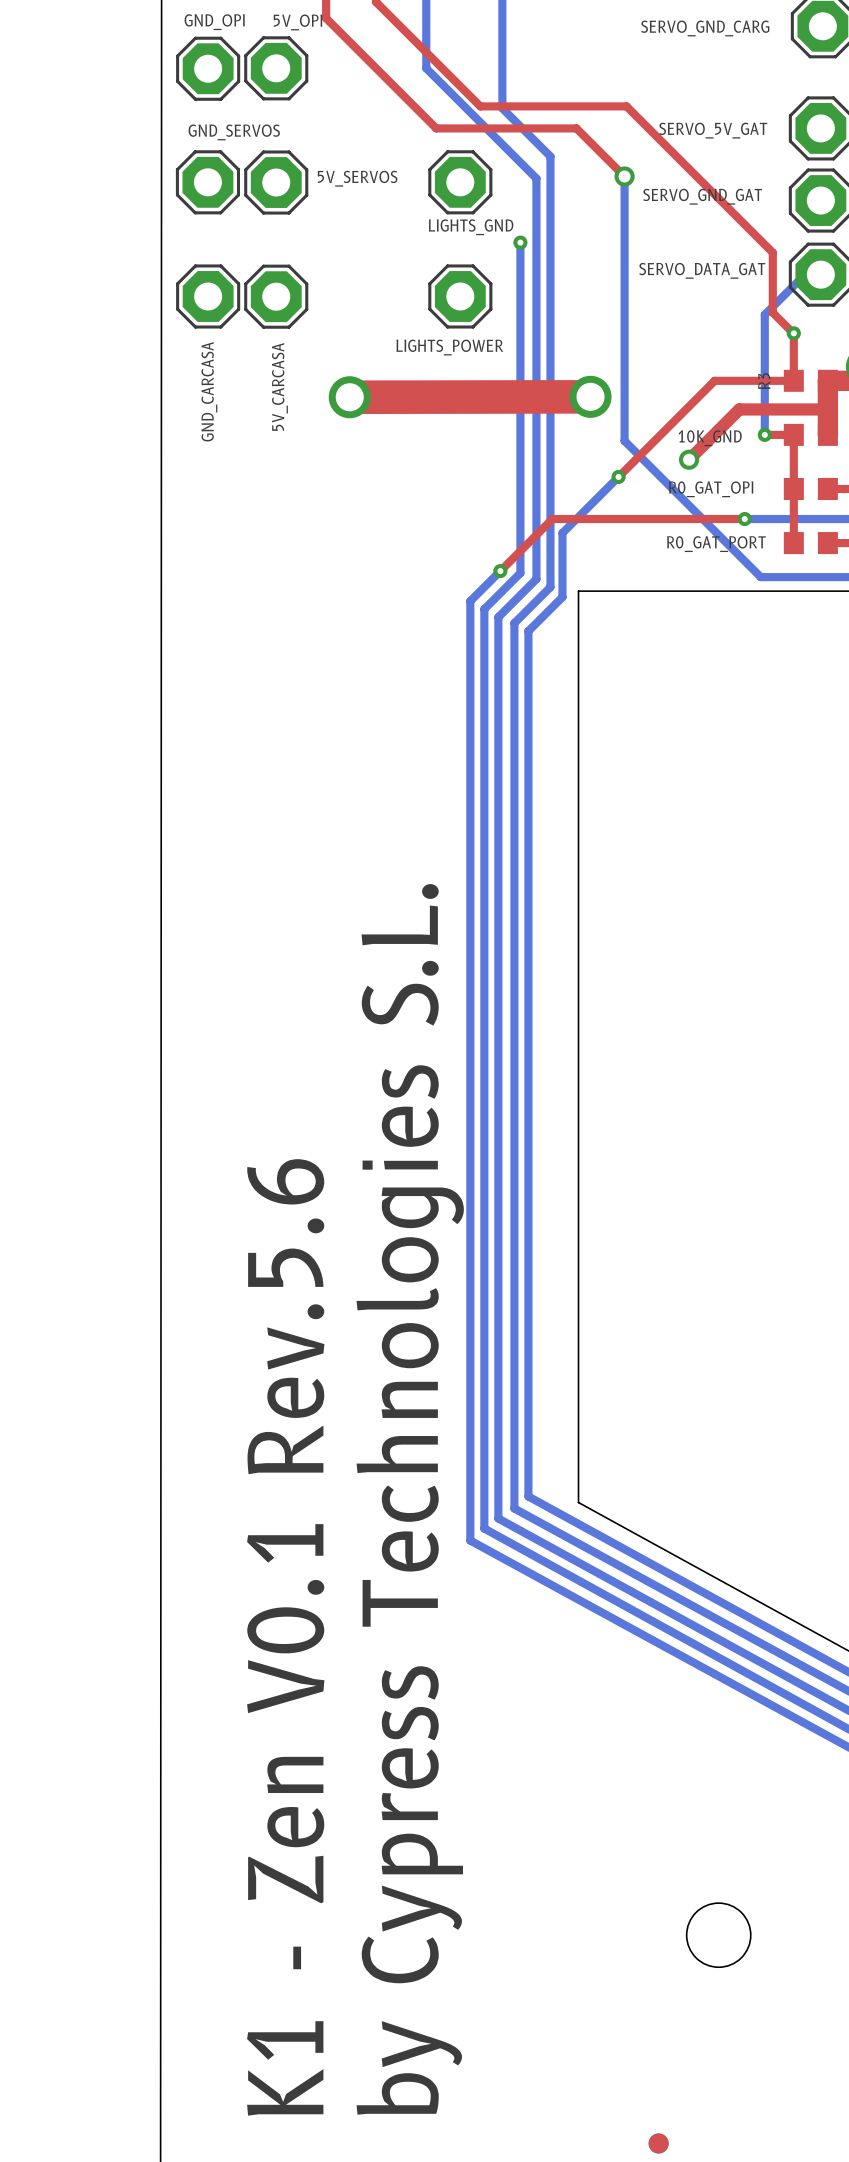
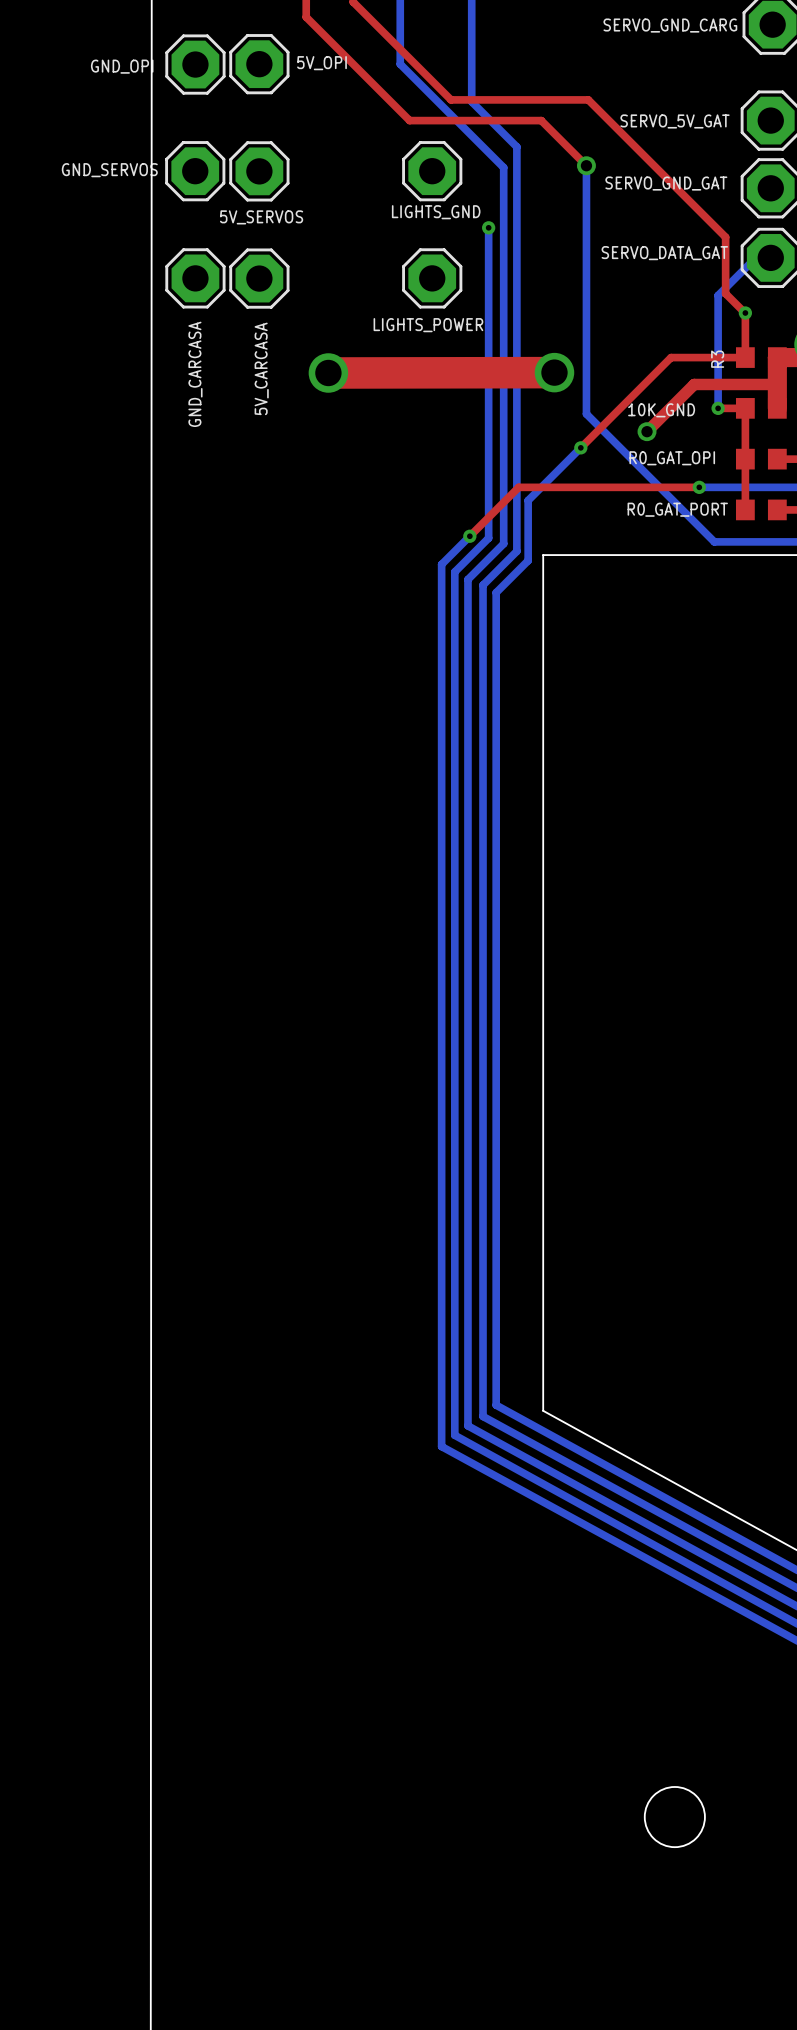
GND_OPI name position: GND_OPI (214, 22) -> GND_OPI (122, 66)
5V_OPI name position: 5V_OPI (297, 22) -> 5V_OPI (321, 63)
GND_SERVOS name position: GND_SERVOS (234, 132) -> GND_SERVOS (109, 170)
5V_SERVOS name position: 5V_SERVOS (357, 178) -> 5V_SERVOS (261, 217)
text: by Cypress Technologies S.L. (410, 1499) -> none
text: K1 - Zen V0.1 Rev.5.6 (285, 1637) -> none
drawing: [648, 2133, 669, 2154] -> none

